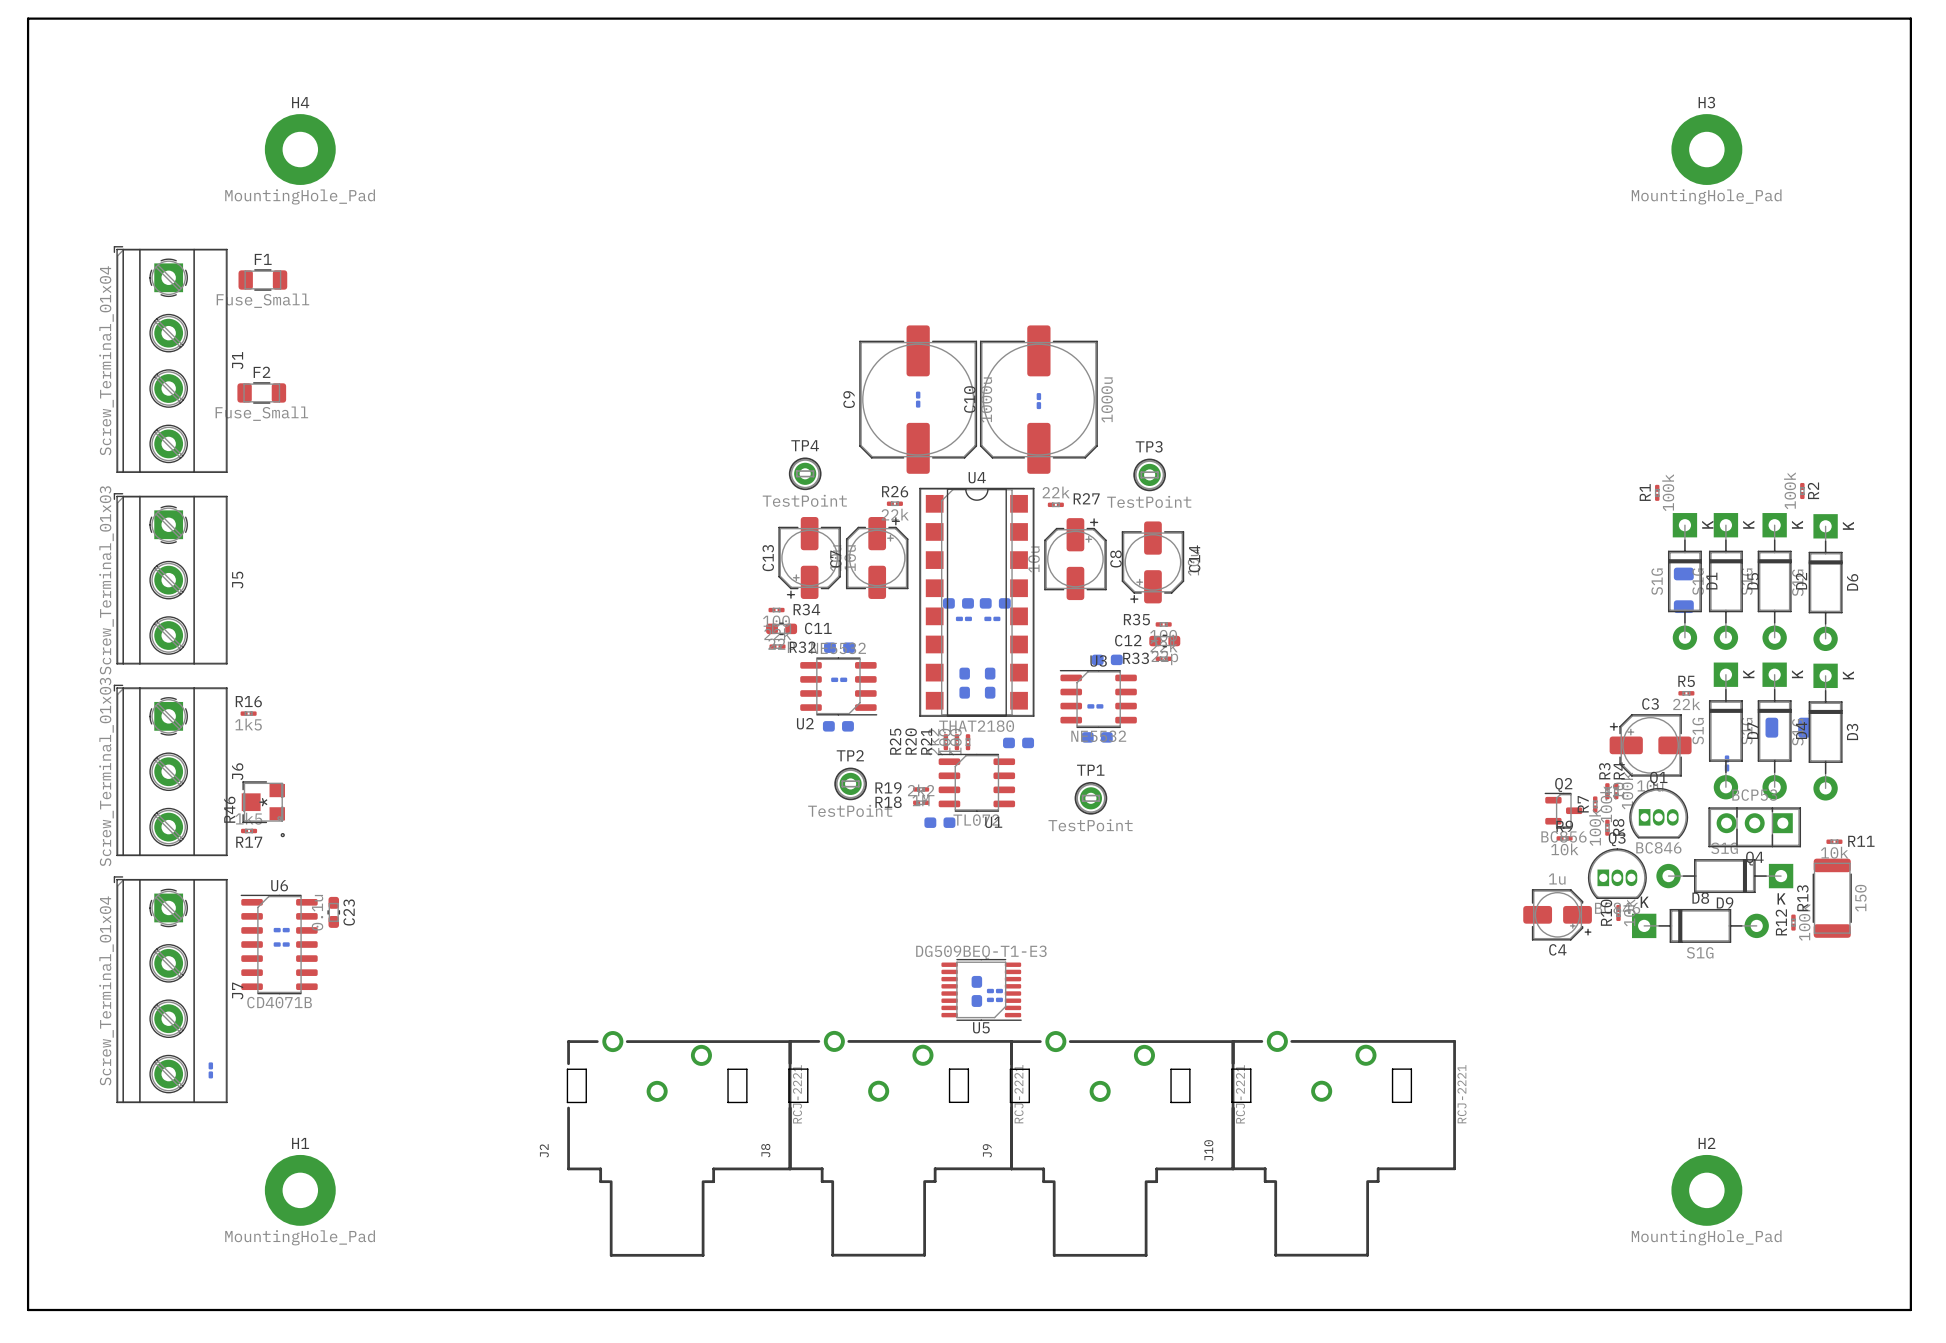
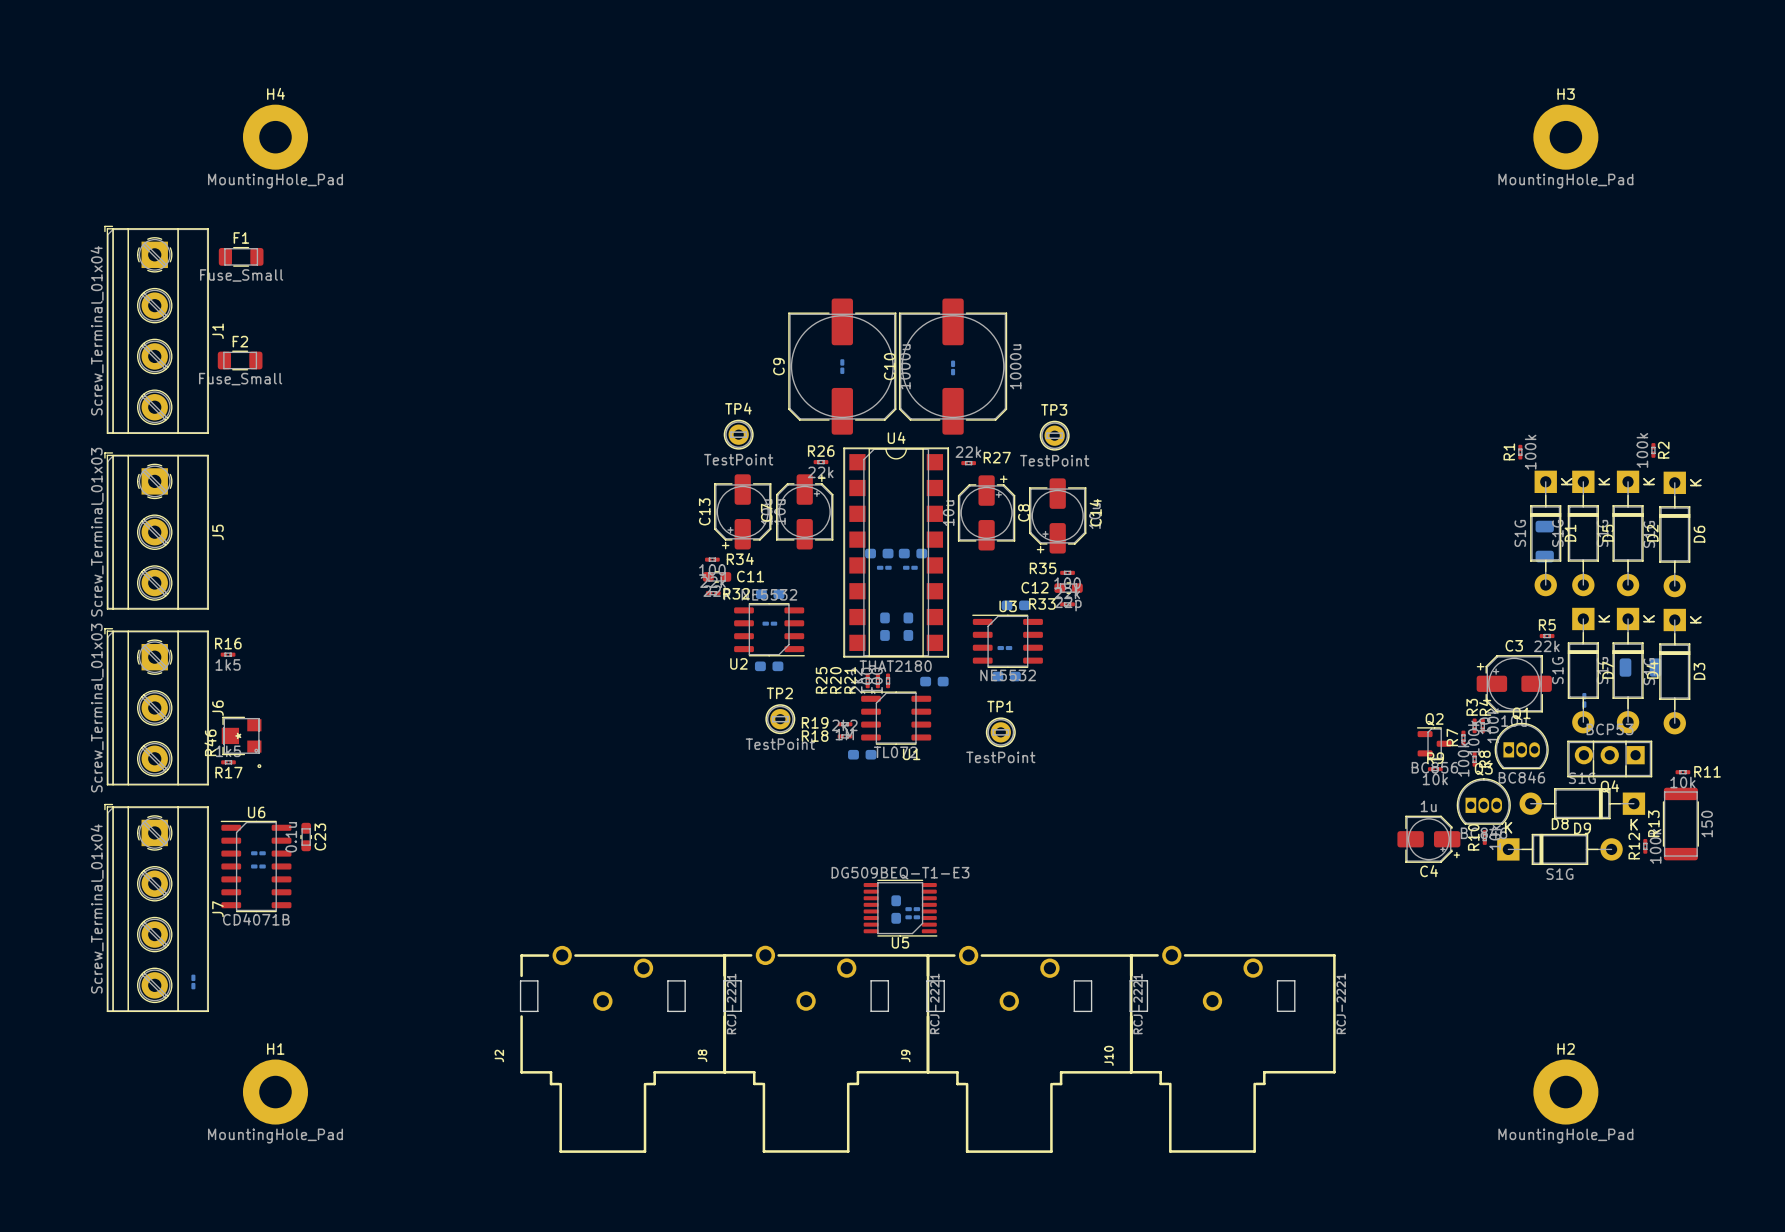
board edge: (28, 18) (1910, 18) (1910, 1310) (28, 1310) (28, 18) -> none

